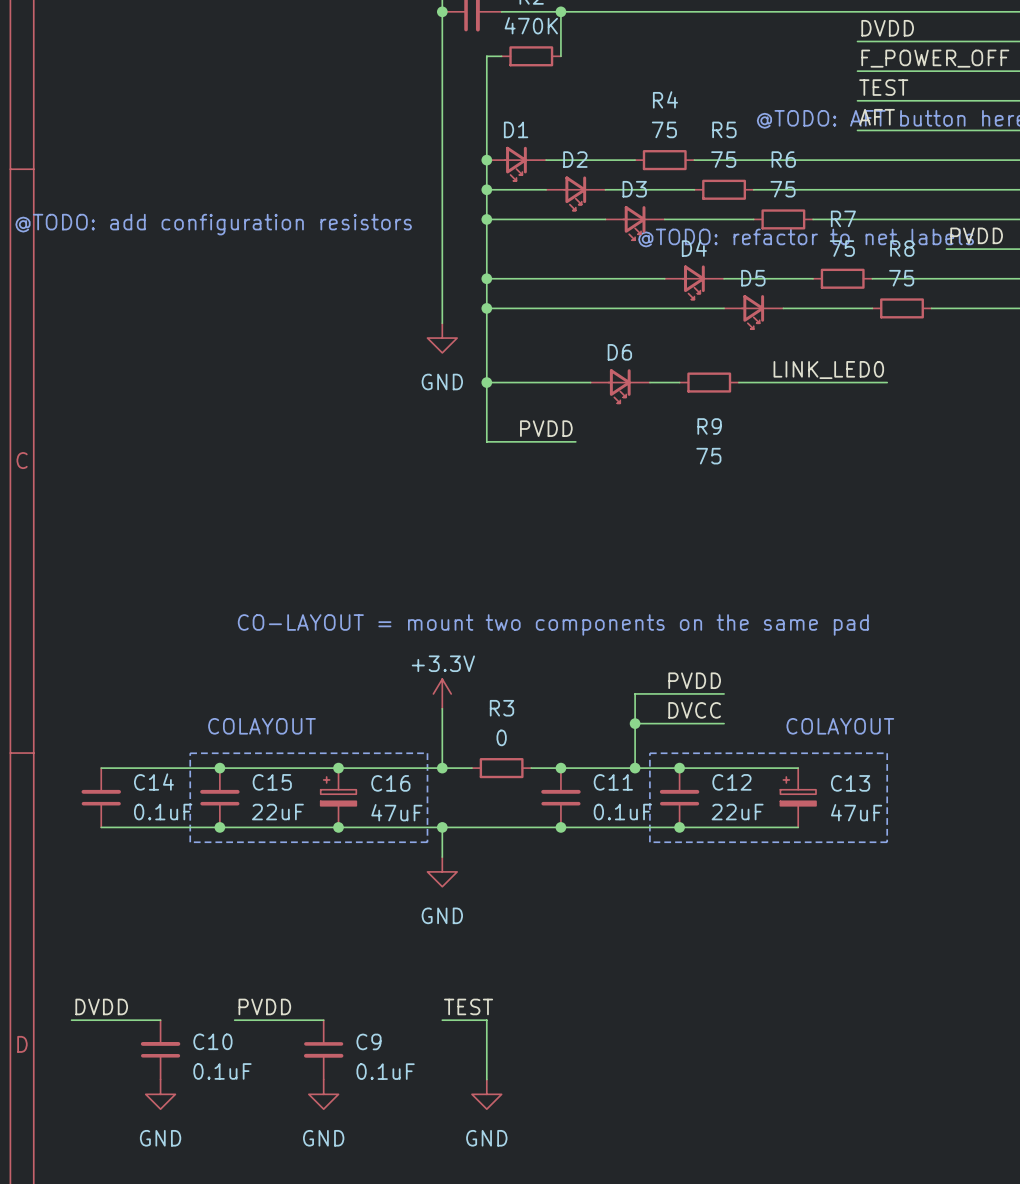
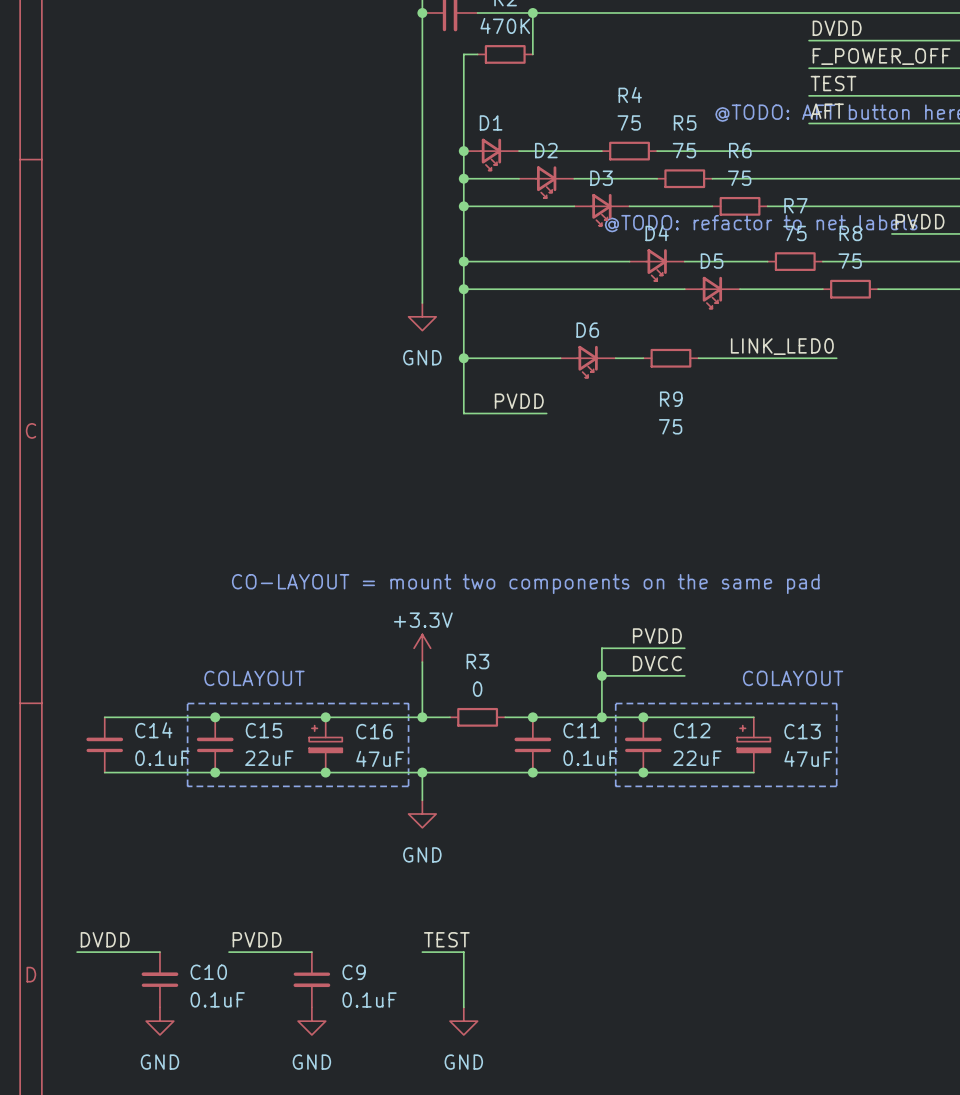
text: @TODO: add configuration resistors (213, 224) -> none

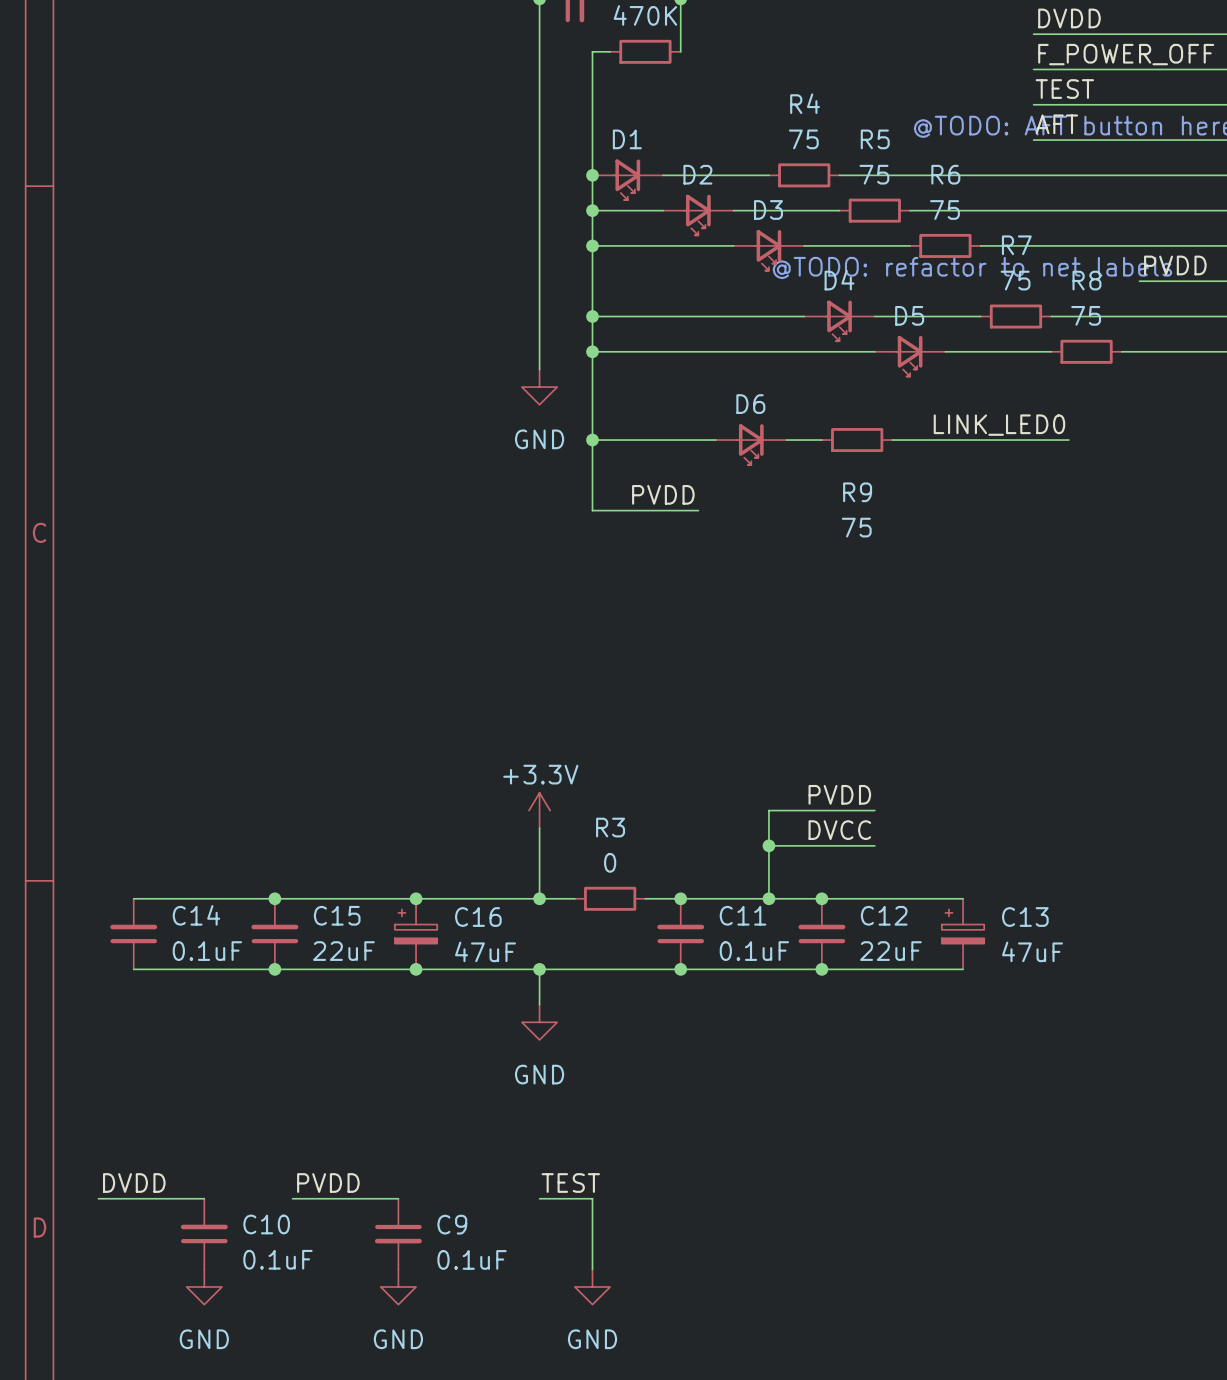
text: CO-LAYOUT = mount two components on the same pad (525, 584) -> none
text: COLAYOUT (254, 678) -> none
text: COLAYOUT (793, 678) -> none
line: (187, 703) (408, 703) (408, 786) (187, 786) (187, 703) -> none
line: (615, 703) (836, 703) (836, 786) (615, 786) (615, 703) -> none

